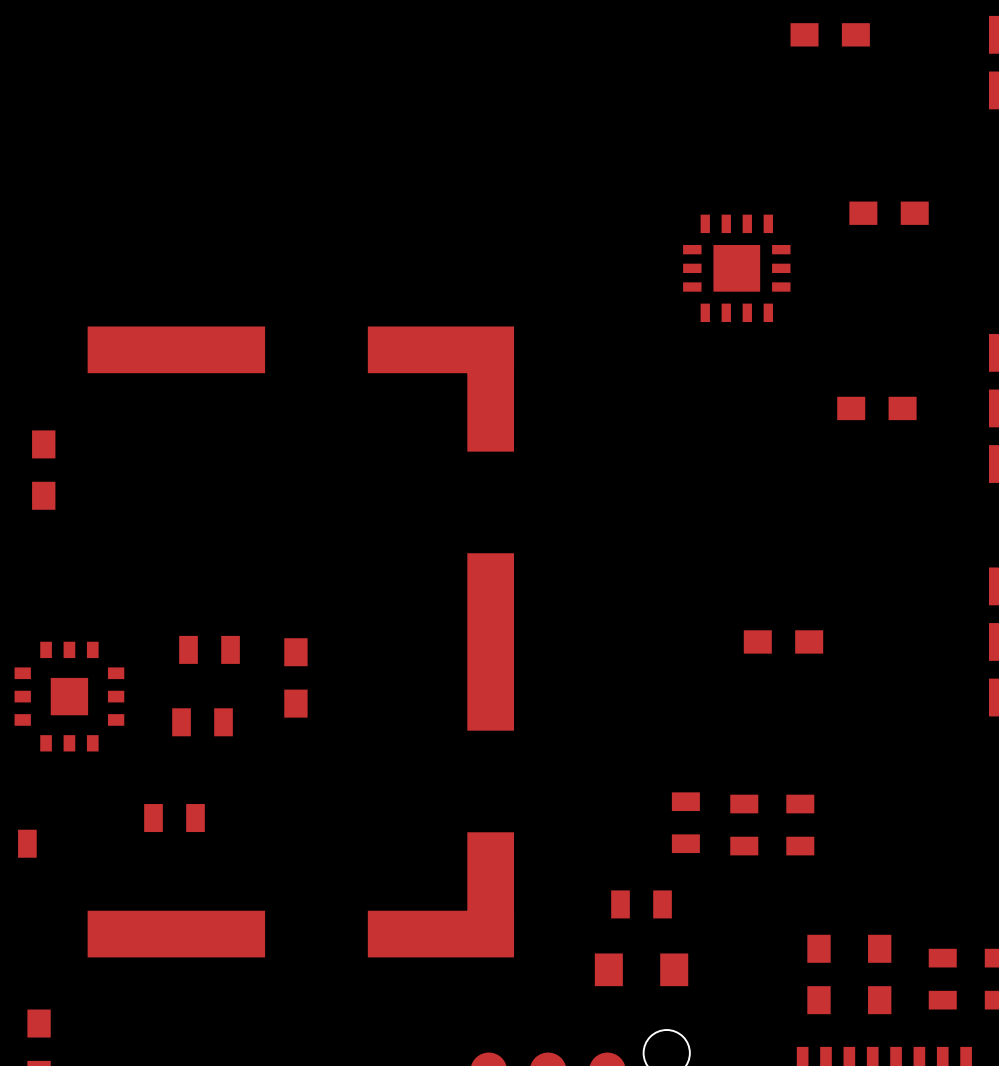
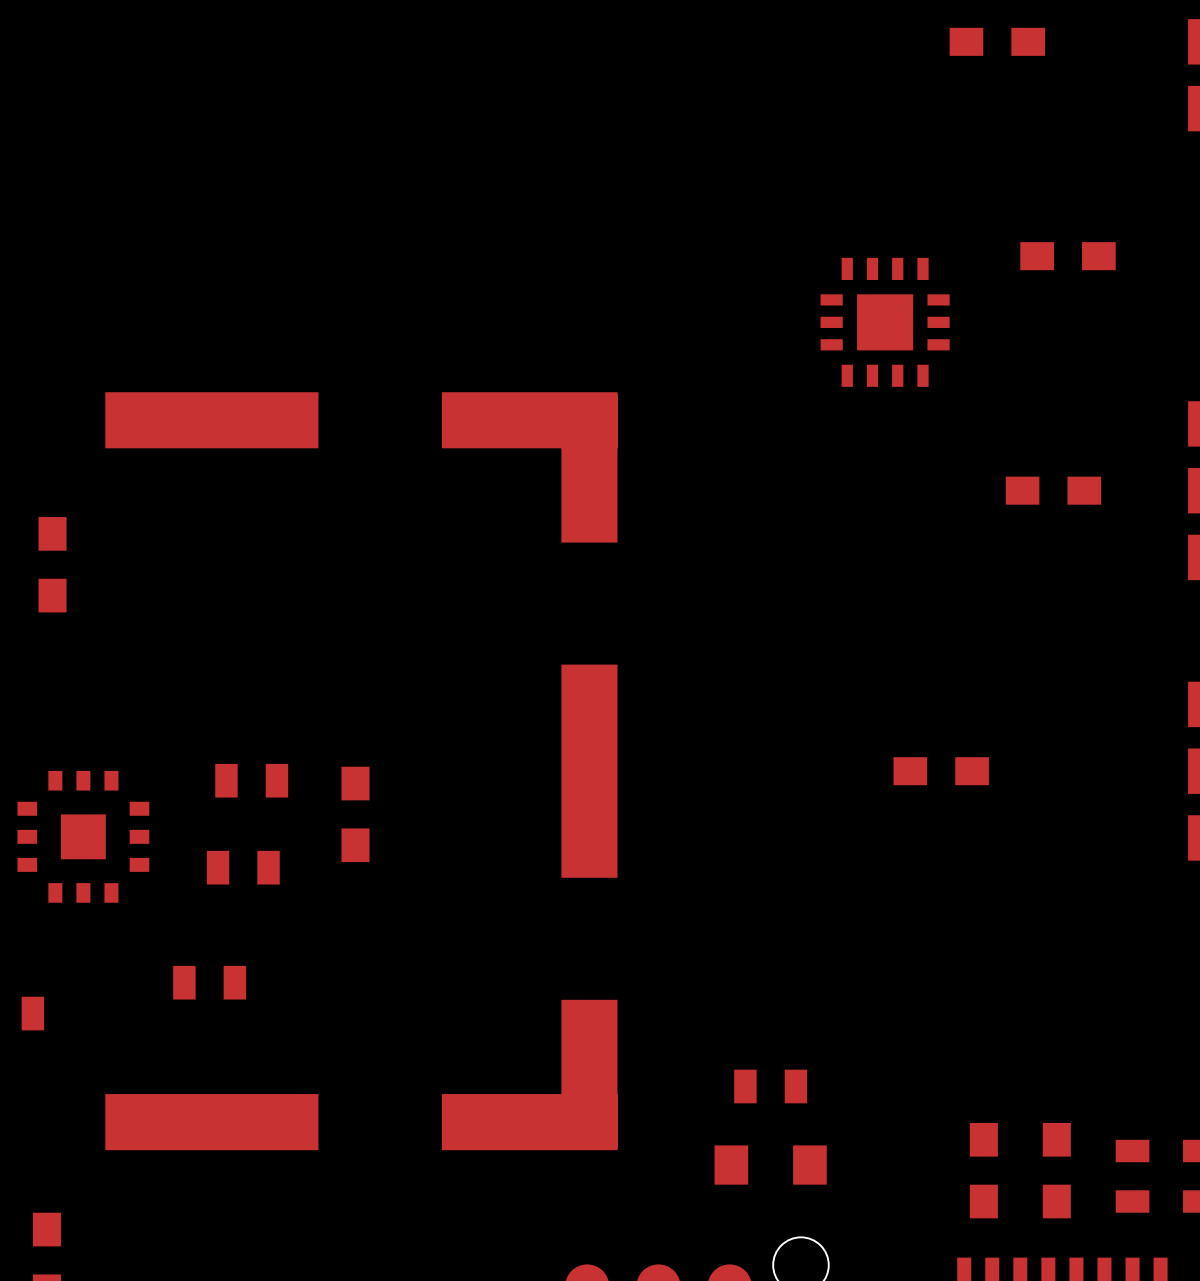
part: (685, 822) -> none
part: (744, 825) -> none
part: (800, 825) -> none

